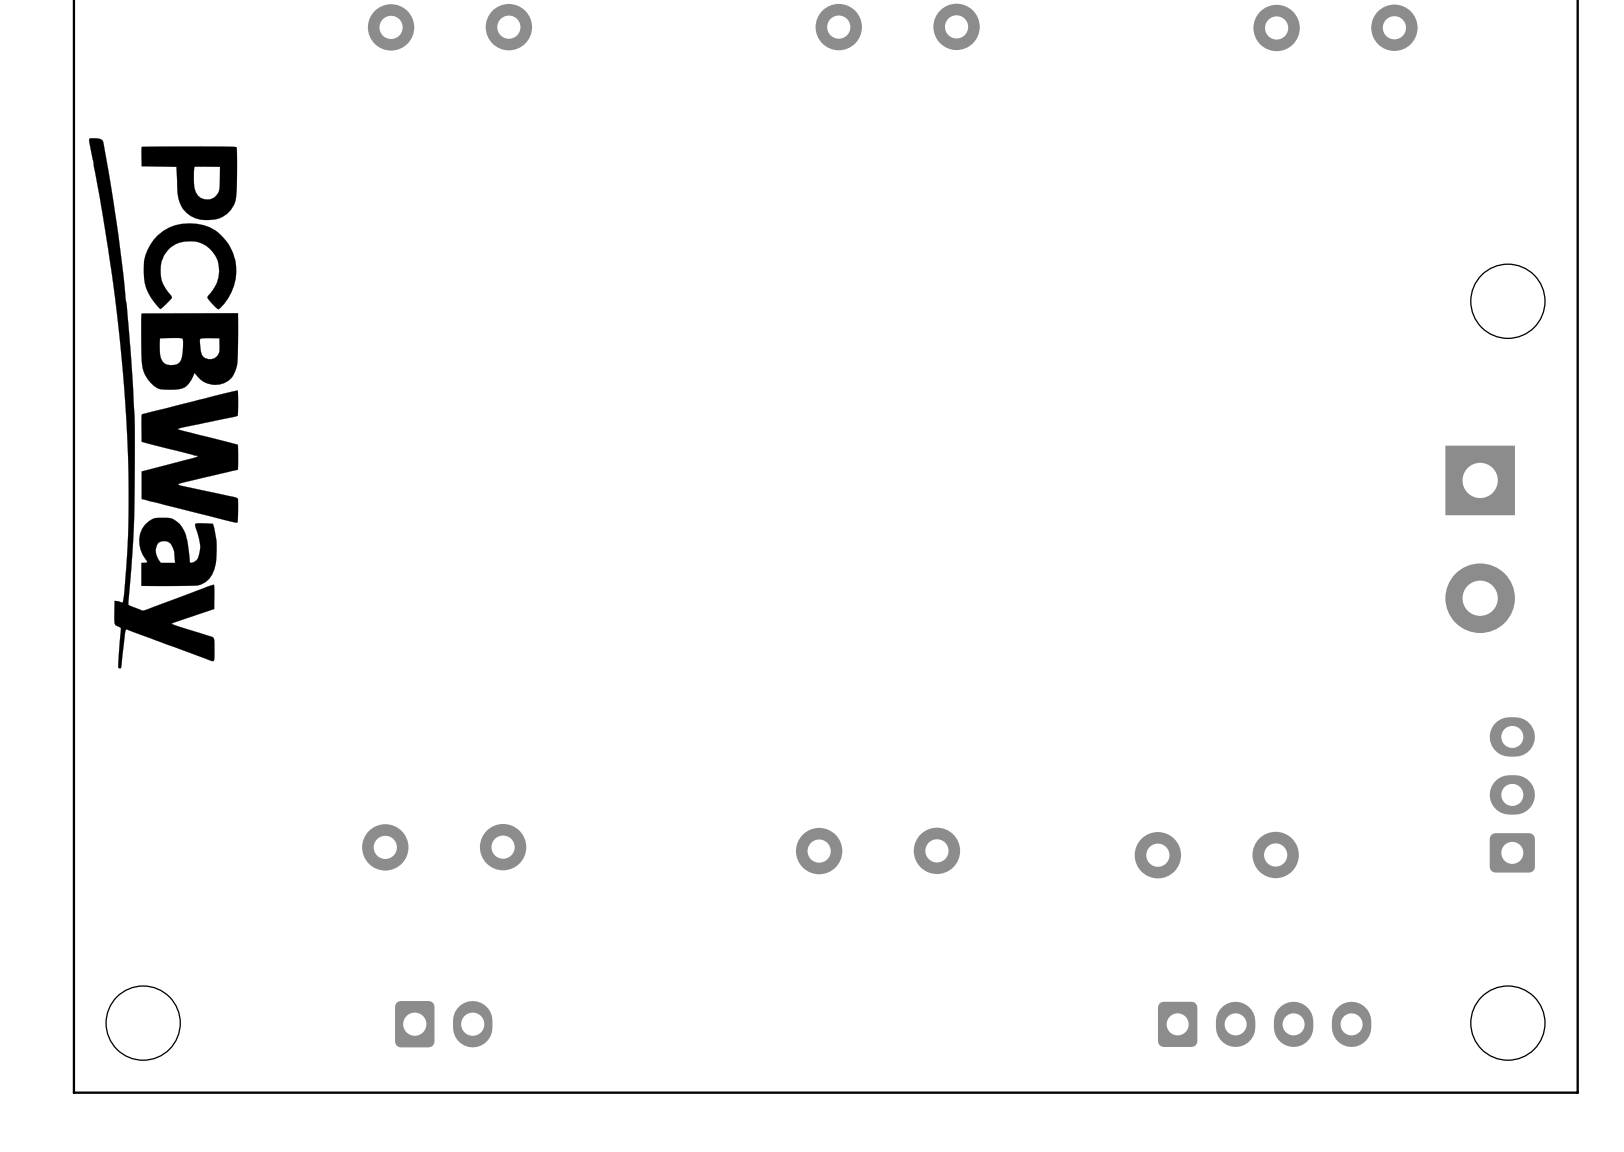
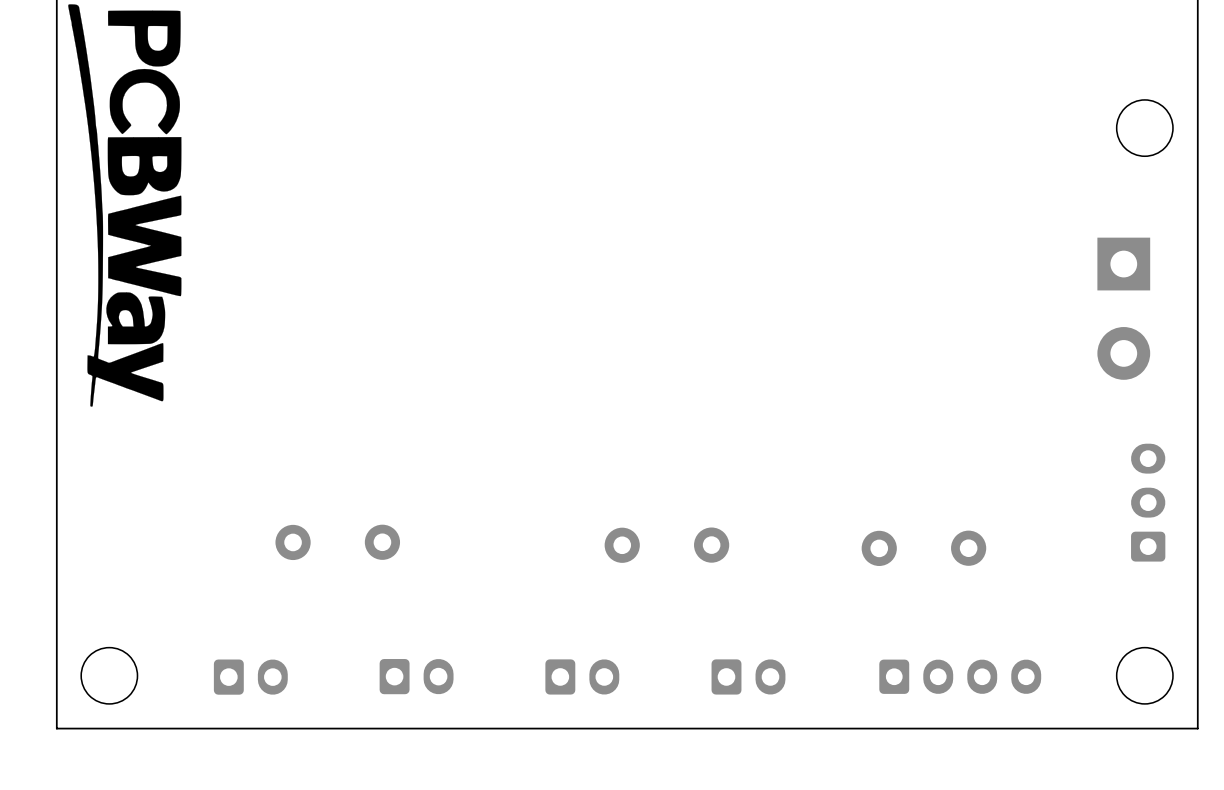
part: none -> (250, 677)
part: (443, 1024) -> none
part: none -> (416, 676)
part: none -> (582, 676)
part: none -> (748, 676)

